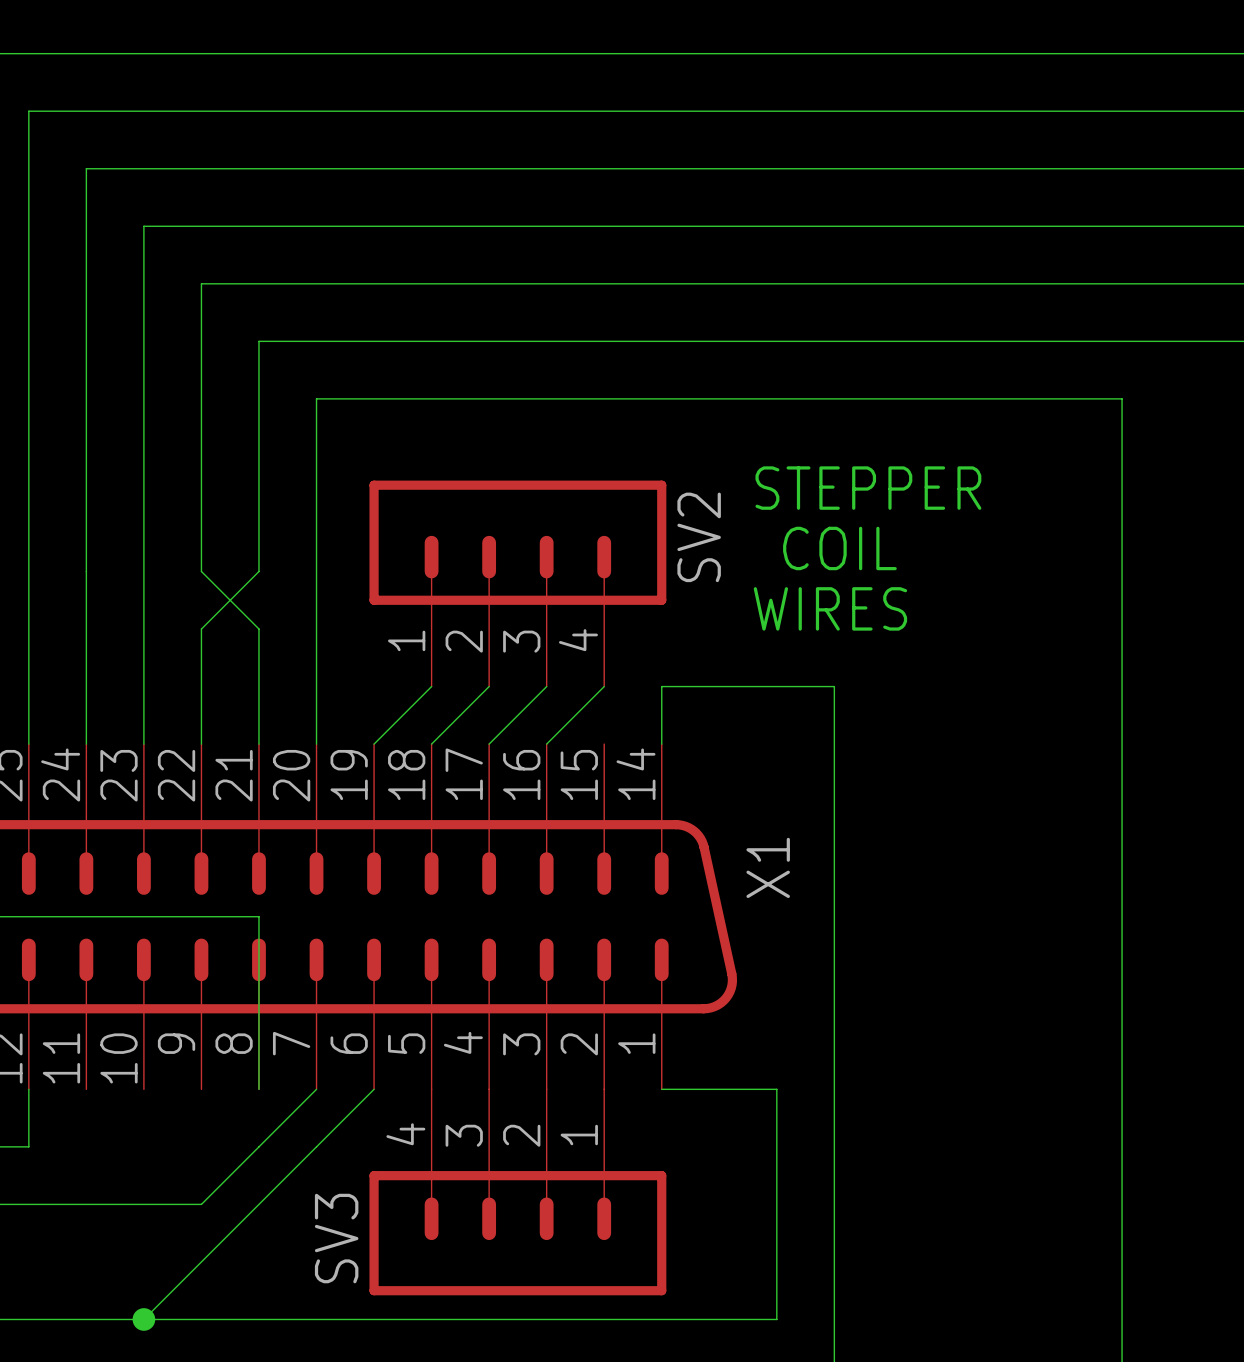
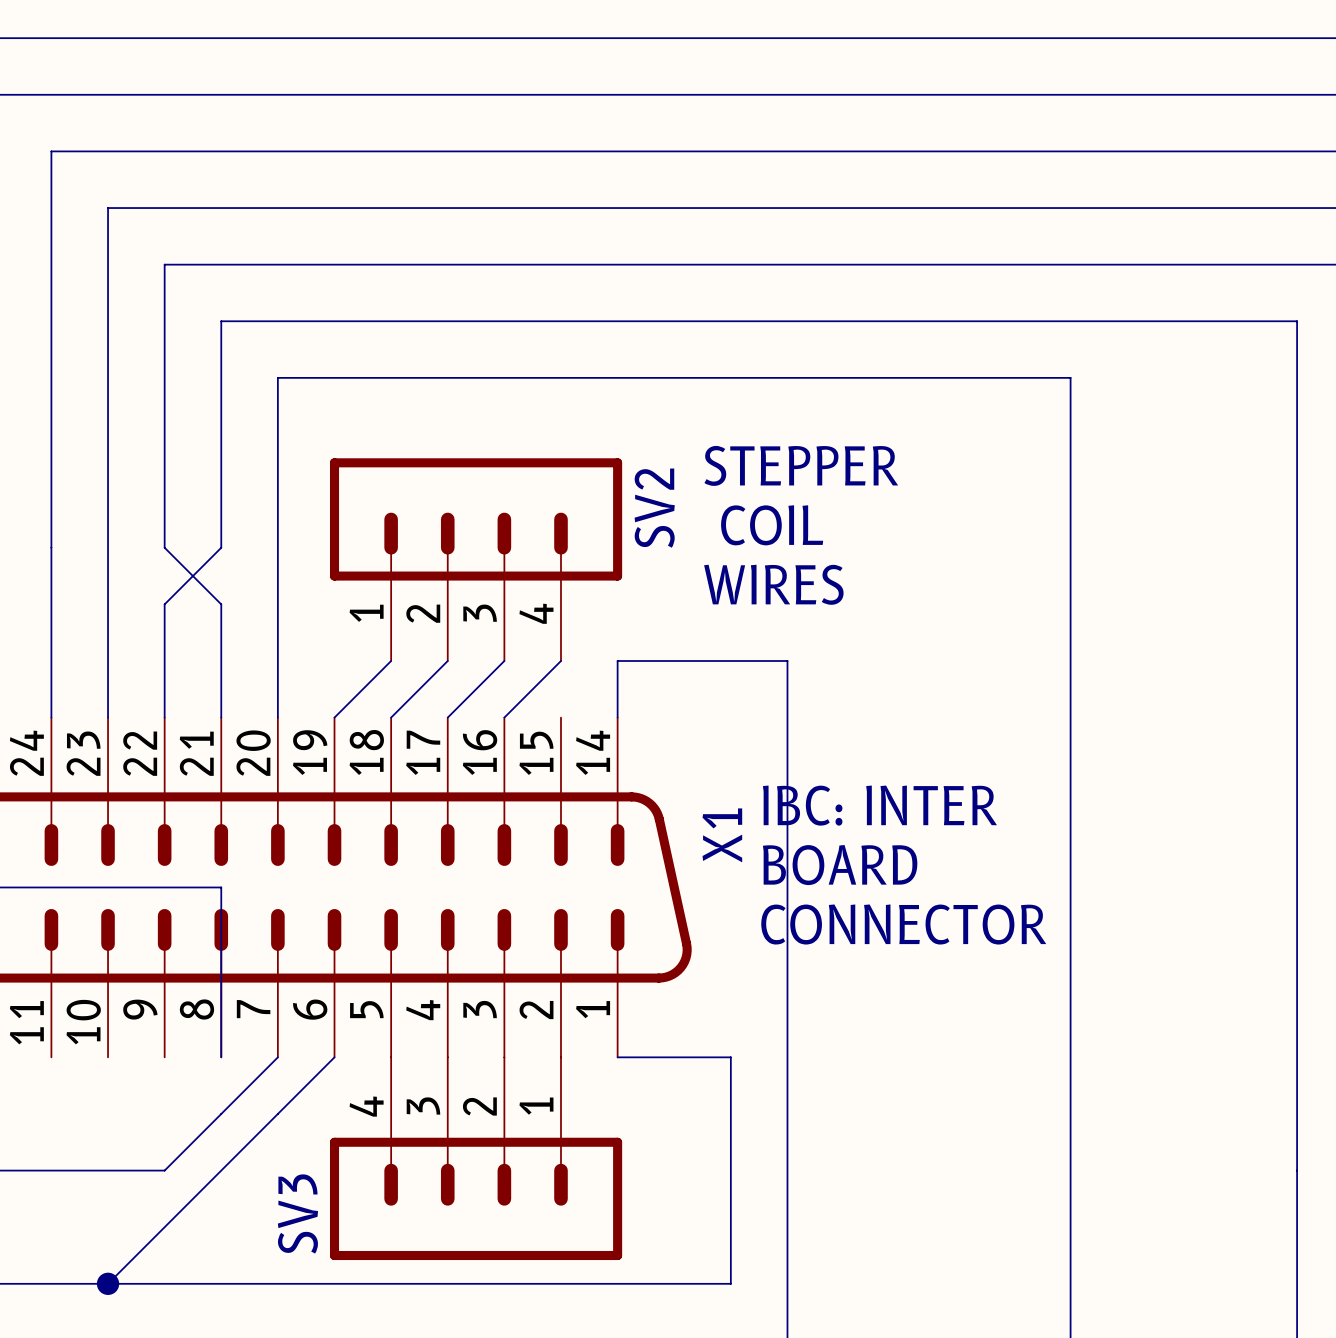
text: none -> IBC: INTER (879, 805)
text: none -> BOARD (840, 865)
text: none -> CONNECTOR (903, 924)

